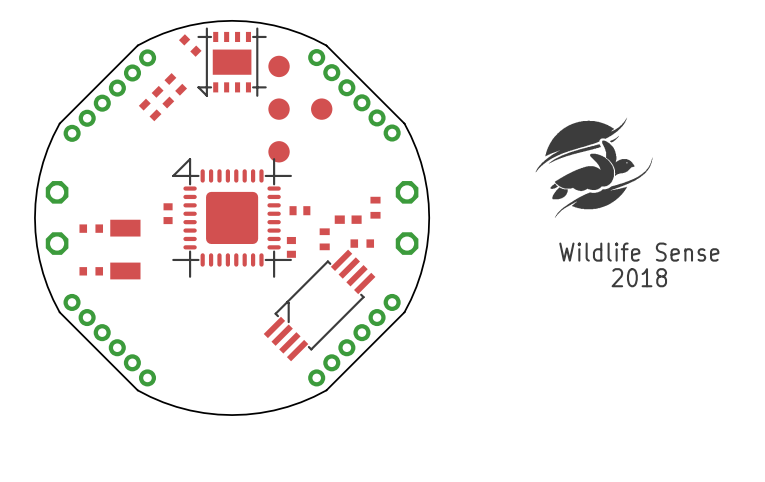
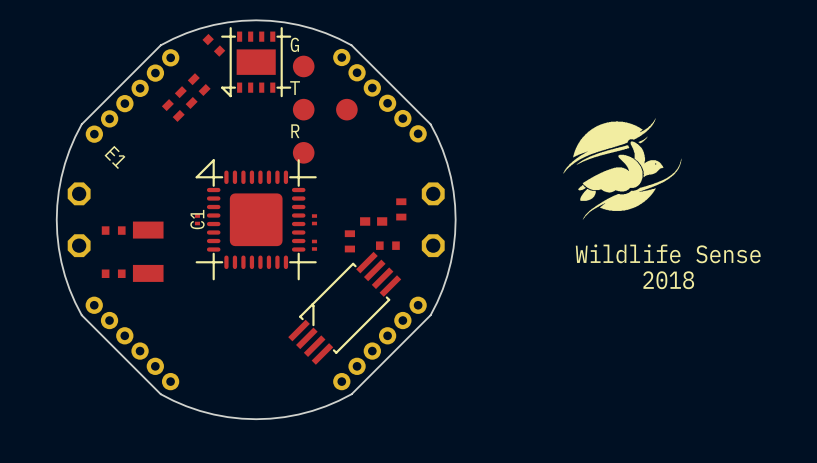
text: none -> G (294, 44)
text: none -> T (295, 88)
text: none -> R (295, 131)
text: none -> E1 (114, 157)
part footprint: [289, 206, 311, 216] -> [311, 214, 318, 226]
part: (168, 213) -> none
C1: none -> (197, 219)
part footprint: [286, 236, 296, 258] -> [311, 239, 318, 251]

